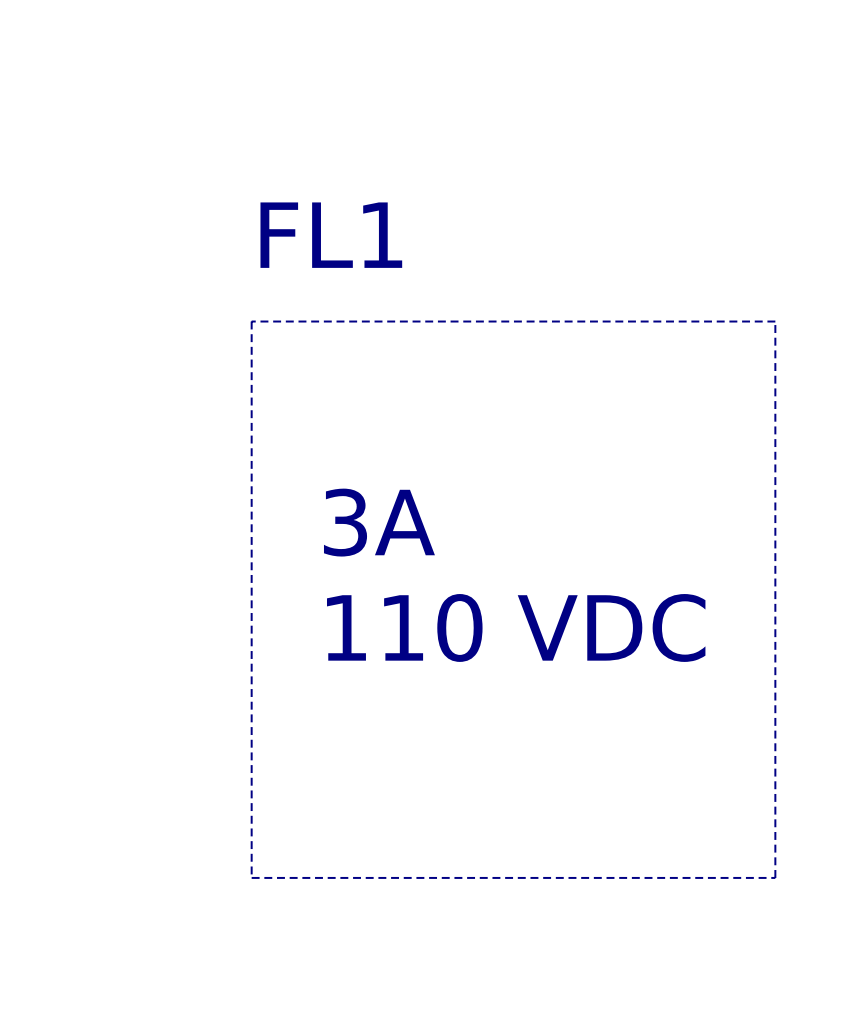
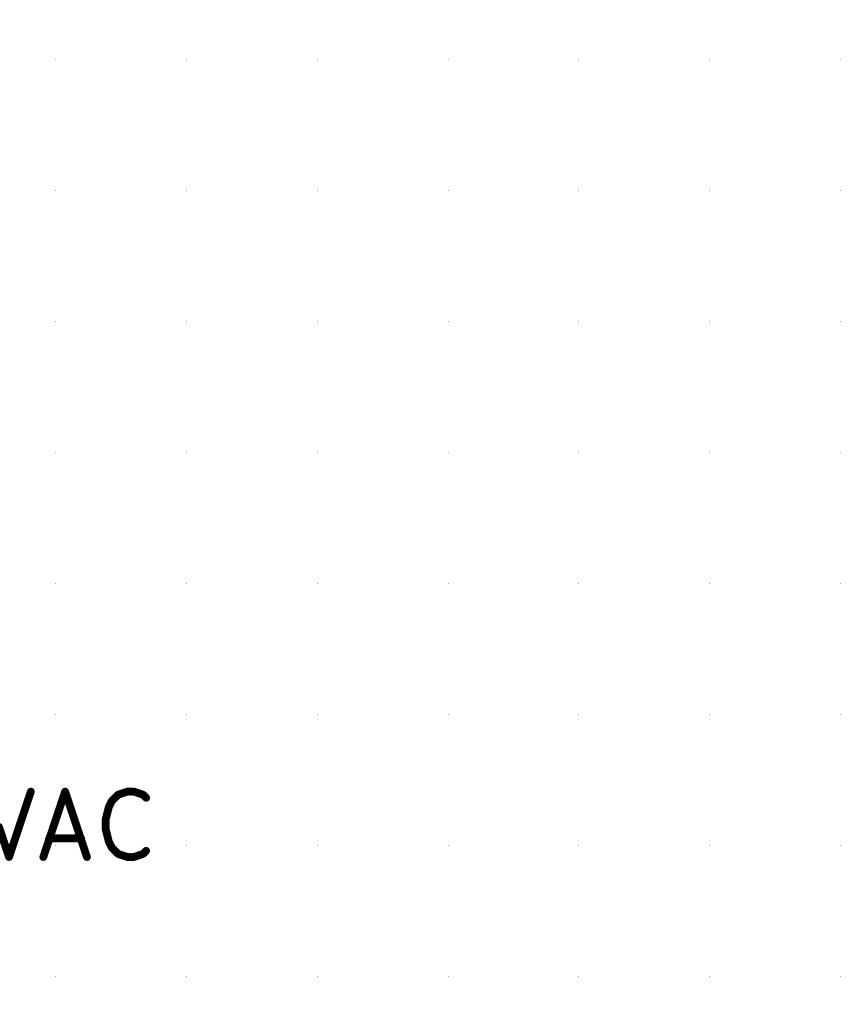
text: FL1 (331, 235) -> none
line: (251, 321) (251, 877) (775, 877) (775, 321) (251, 321) -> none
text: 3A (379, 522) -> none
text: 110 VDC (516, 627) -> none

